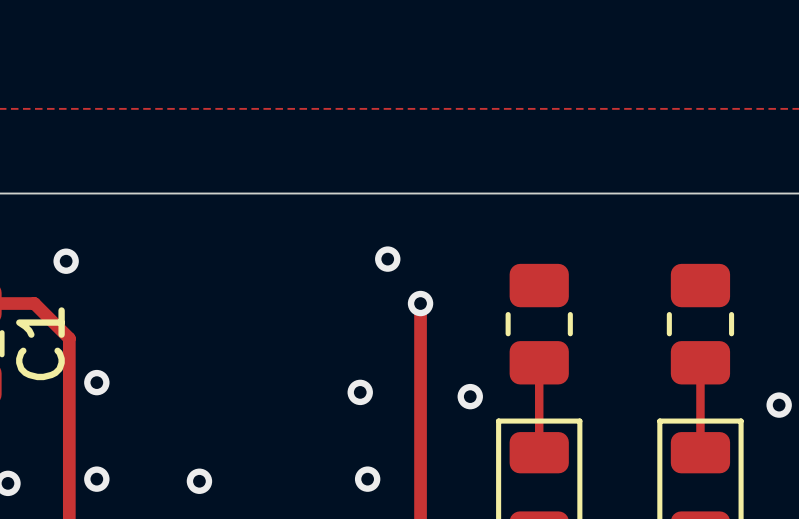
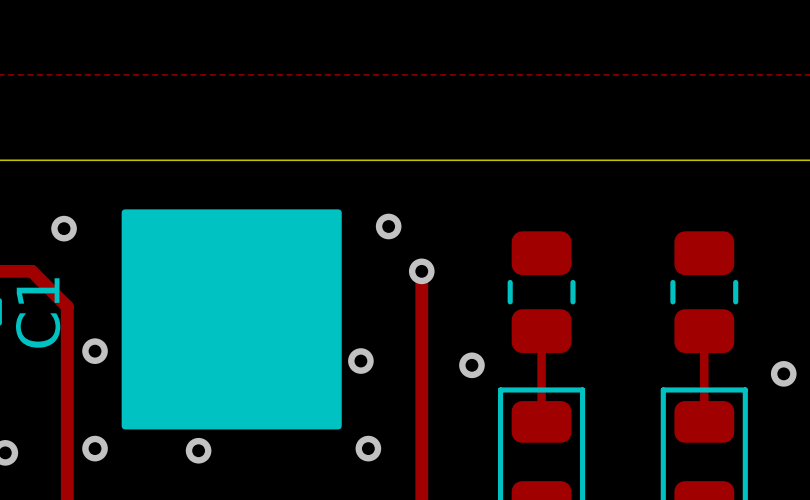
drawing: none -> [121, 209, 342, 430]

